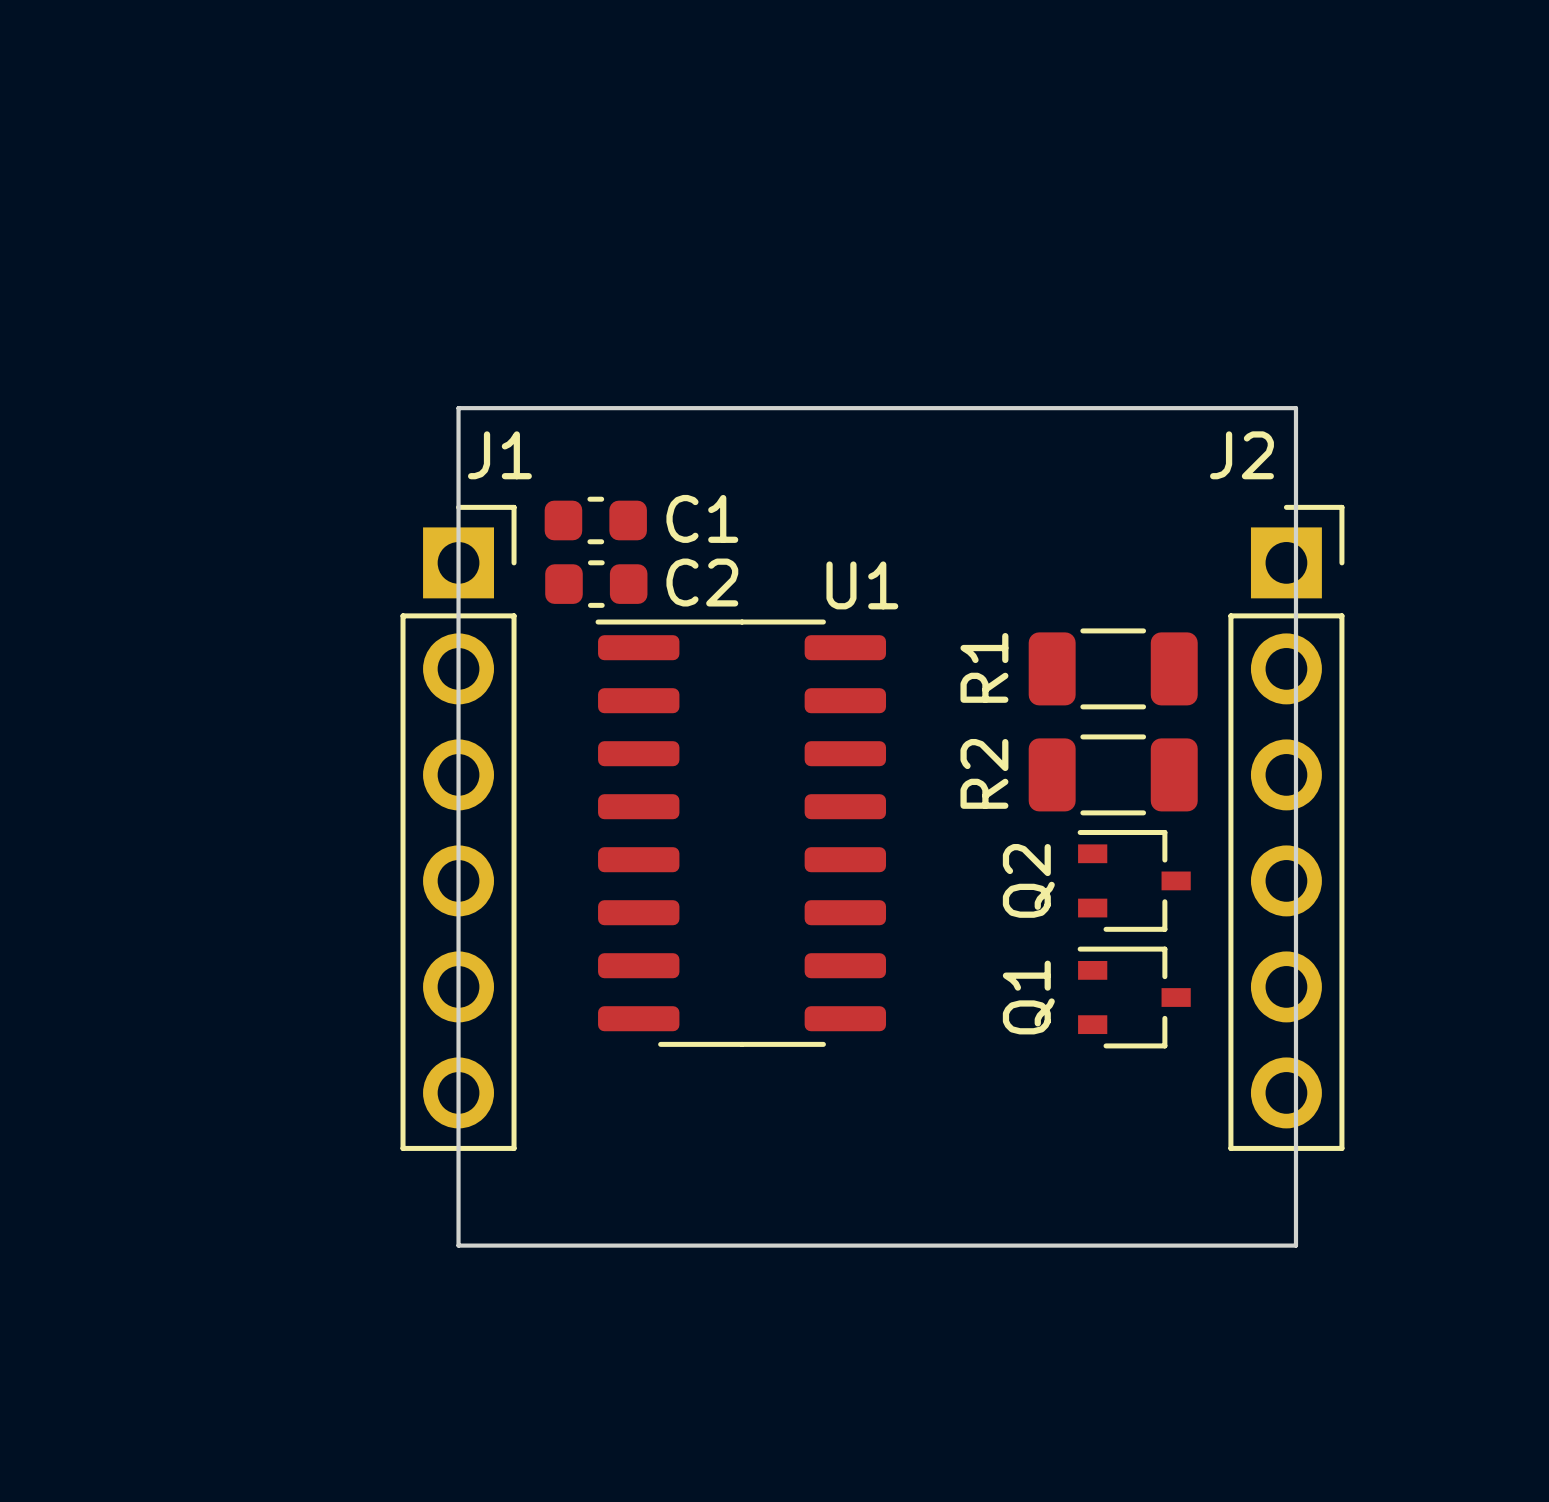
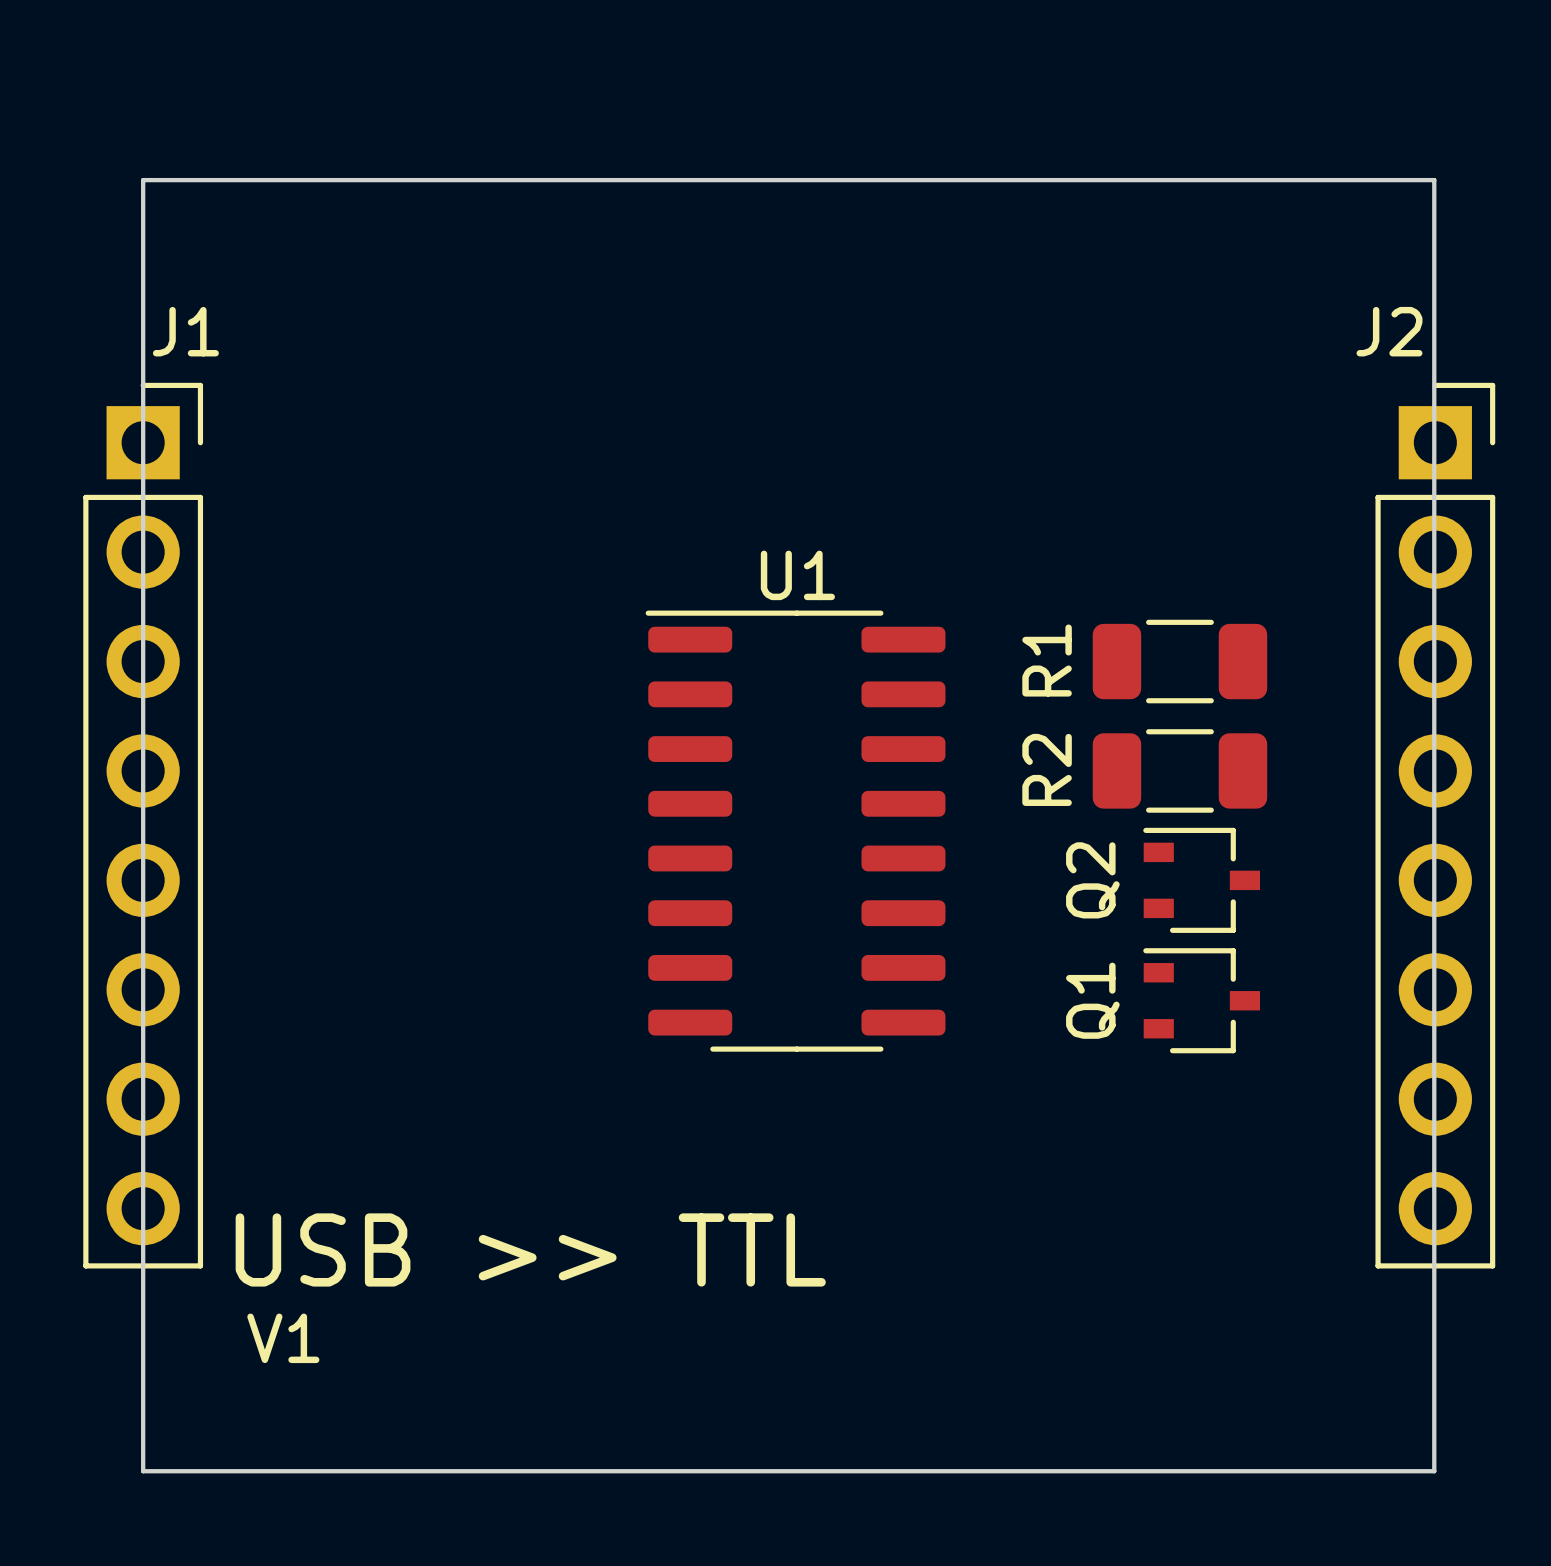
board edge: none -> (143, 180) (1434, 180) (1434, 1471) (143, 1471) (143, 180)
board edge: (458, 408) (458, 1245) (1295, 1245) (1295, 408) (458, 408) -> none
J1 name position: J1 (499, 455) -> J1 (185, 331)
J2 name position: J2 (1241, 455) -> J2 (1389, 331)
J1 footprint: [400, 504, 517, 1151] -> [83, 382, 204, 1269]
J2 footprint: [1228, 504, 1345, 1151] -> [1375, 382, 1496, 1269]
C1: (595, 520) -> none
C2: (596, 584) -> none
U1 name position: U1 (862, 585) -> U1 (797, 575)
text: none -> USB >> TTL (530, 1249)
text: none -> V1 (283, 1338)

